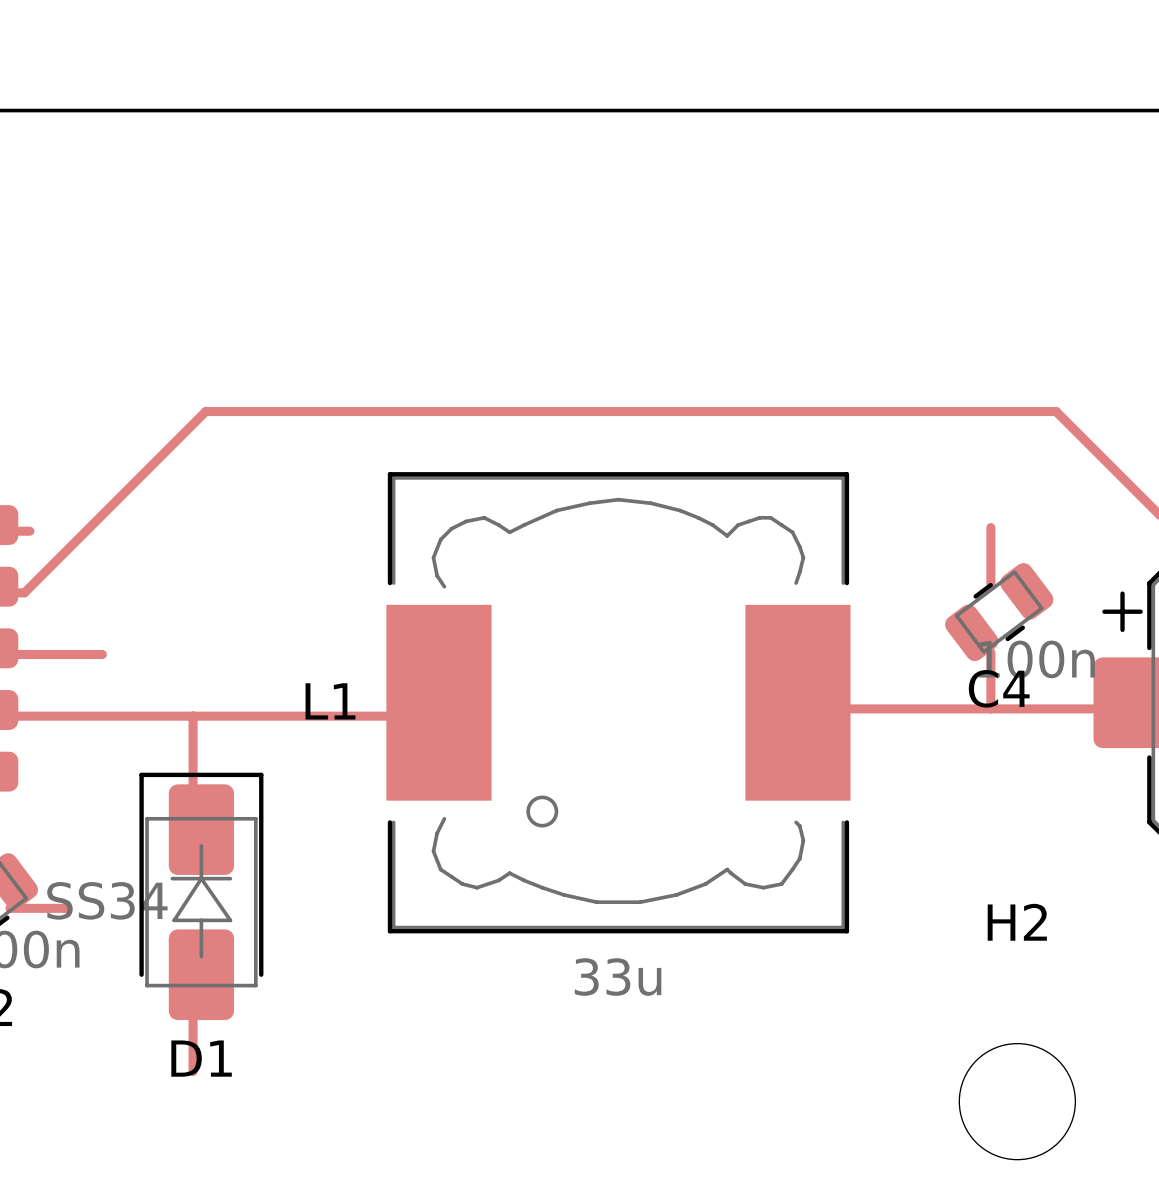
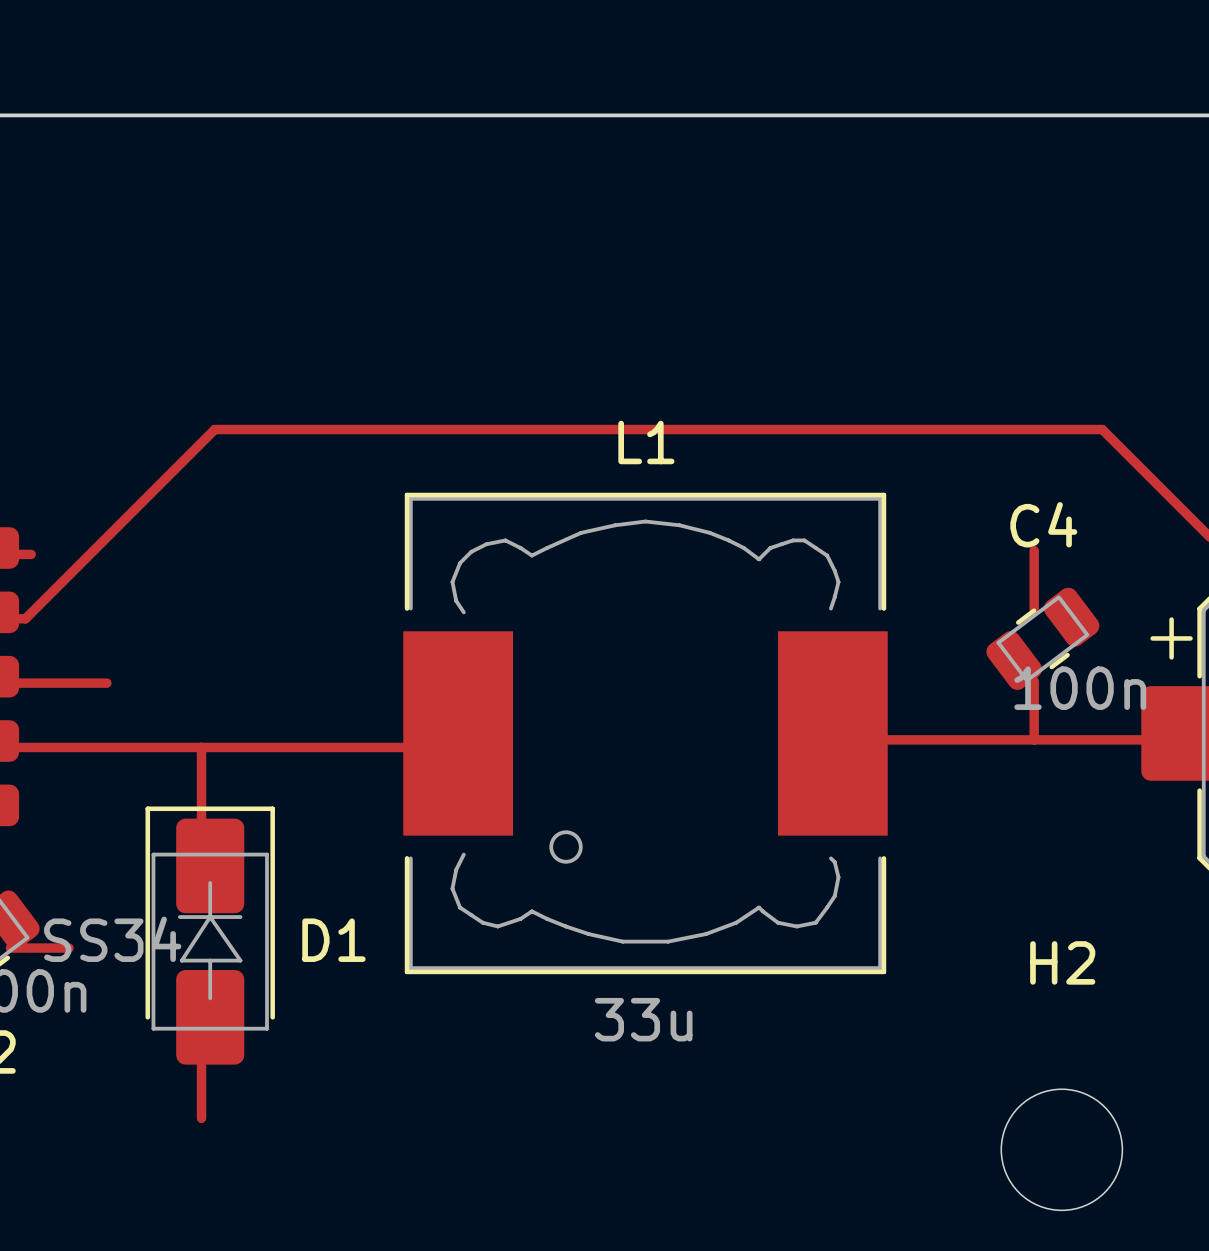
C4 name position: C4 (999, 688) -> C4 (1043, 524)
L1 name position: L1 (330, 701) -> L1 (646, 442)
D1 name position: D1 (201, 1058) -> D1 (333, 940)

